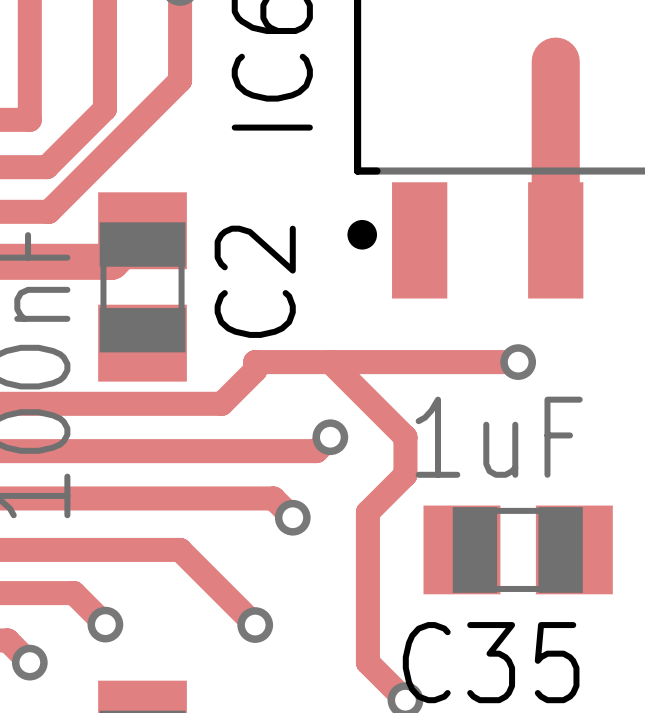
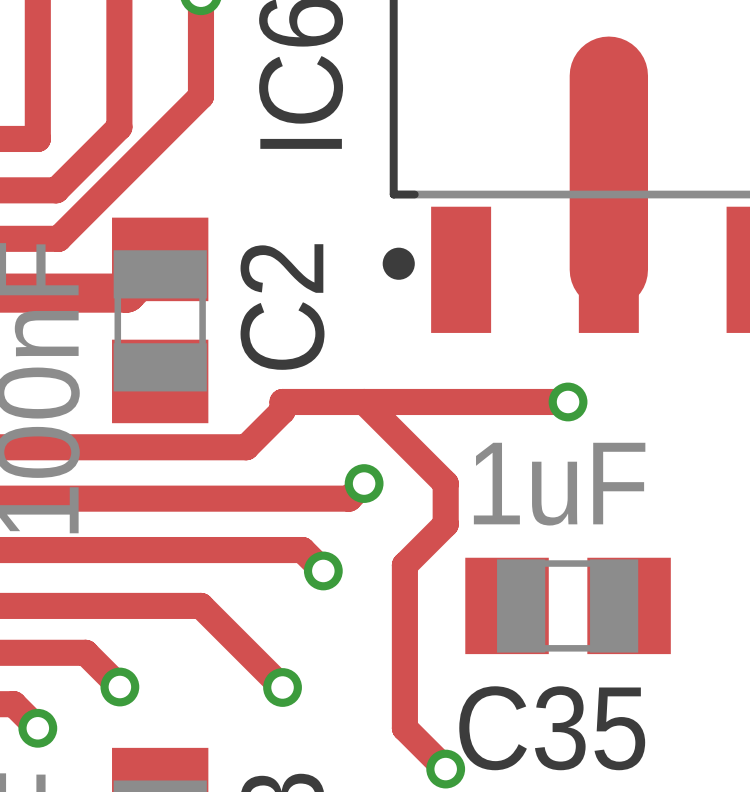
track width: thin (555, 61) (555, 240) -> thick (608, 75) (608, 269)

